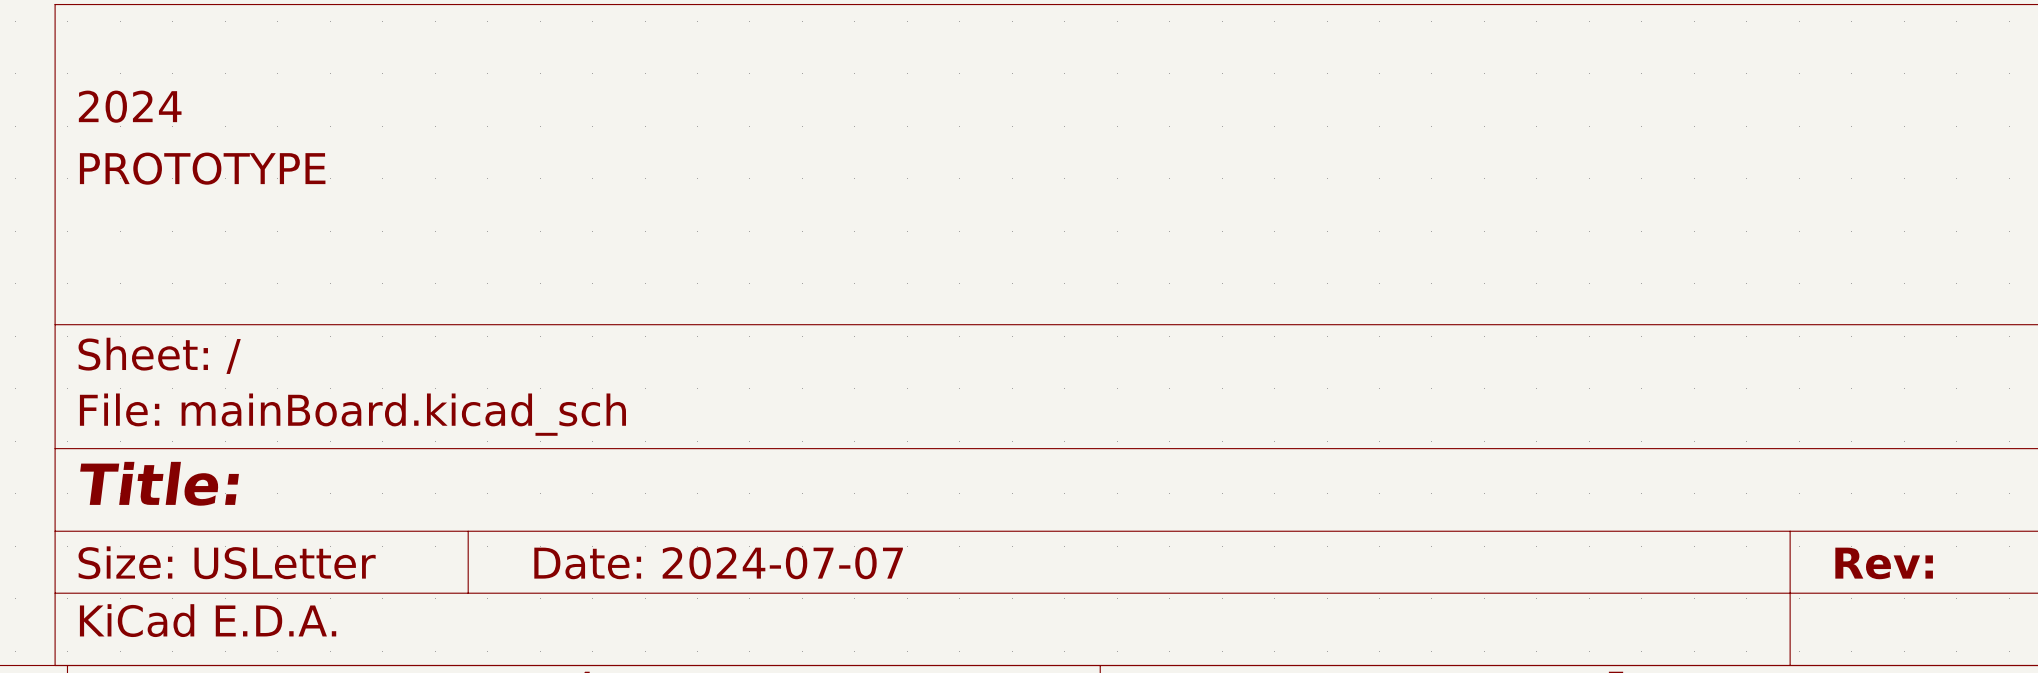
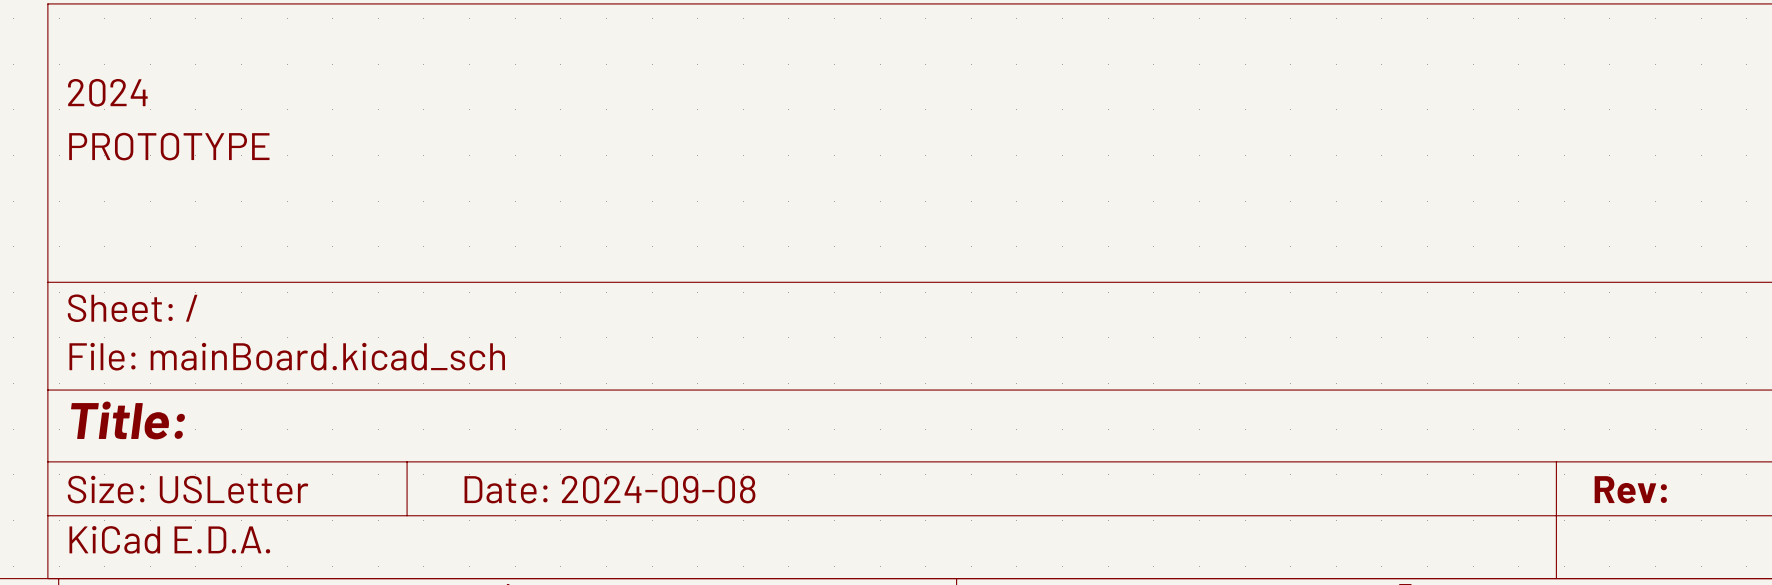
title block: Date: 2024-07-07 (718, 563) -> Date: 2024-09-08 (609, 489)

